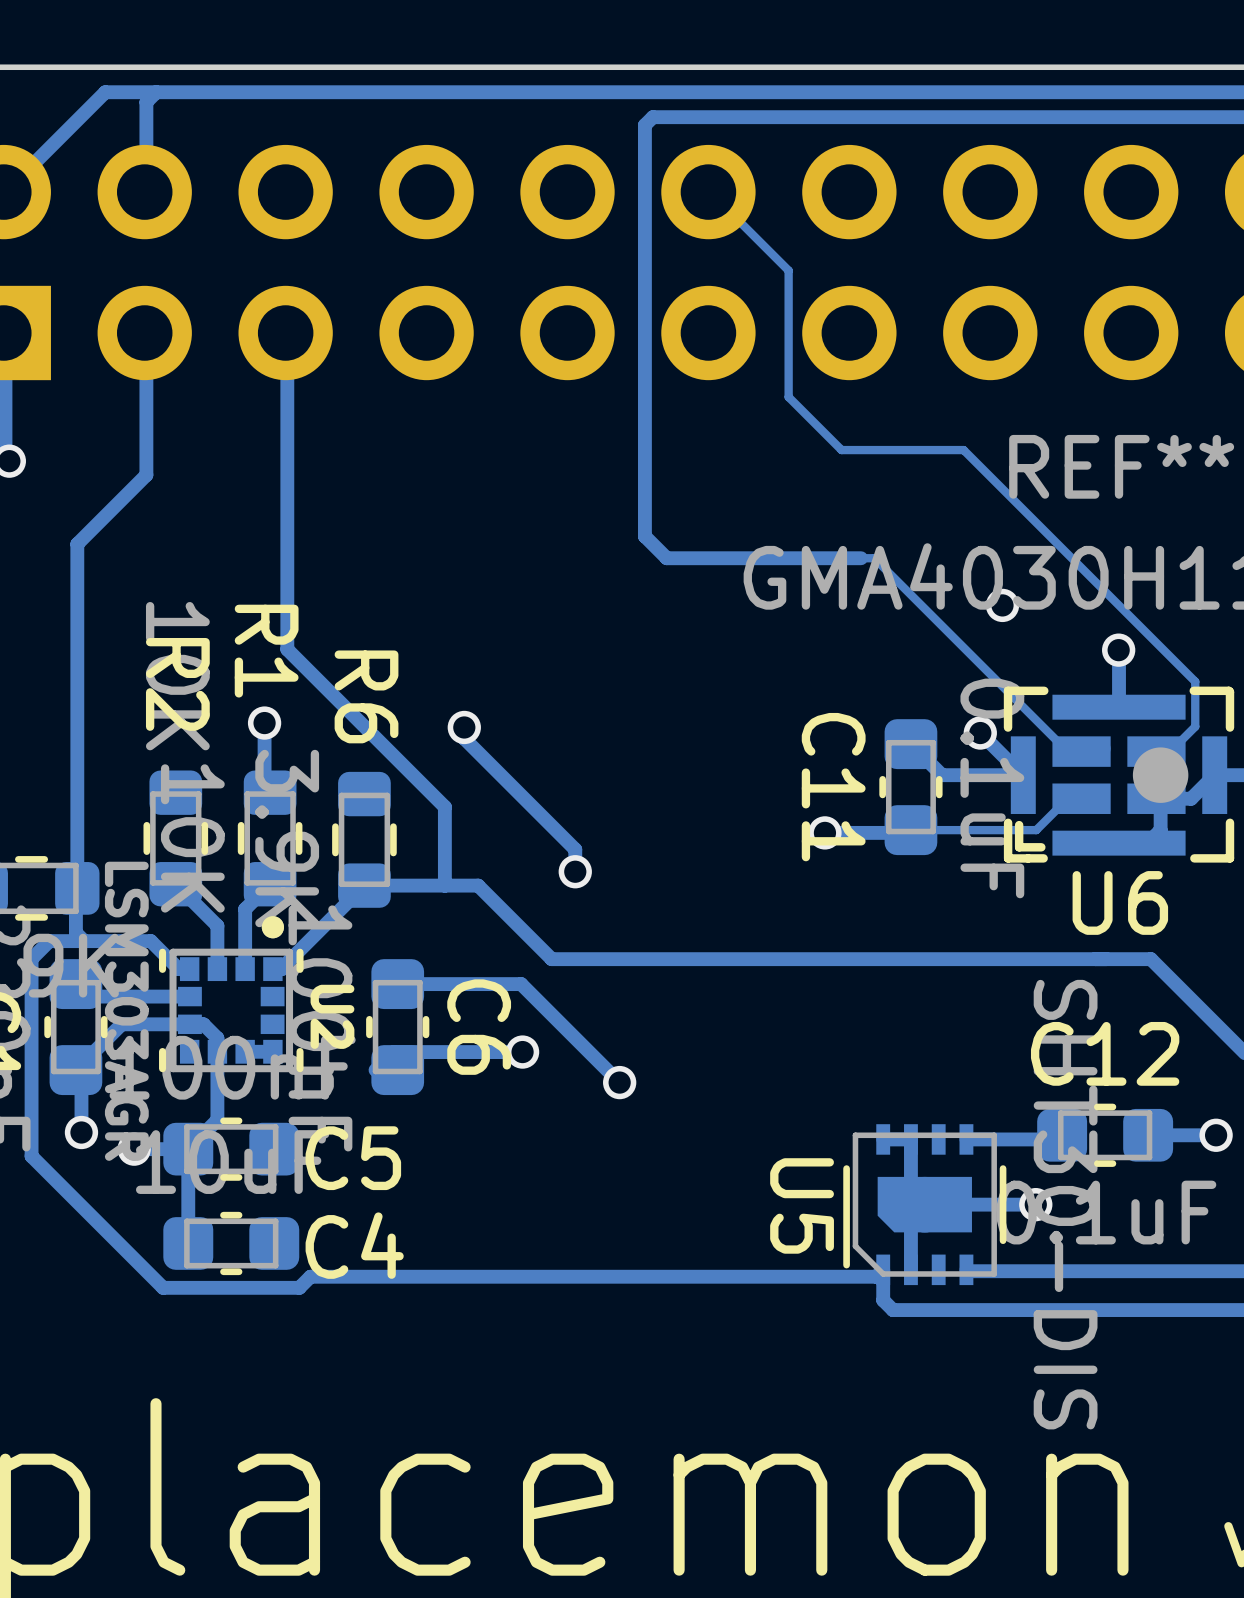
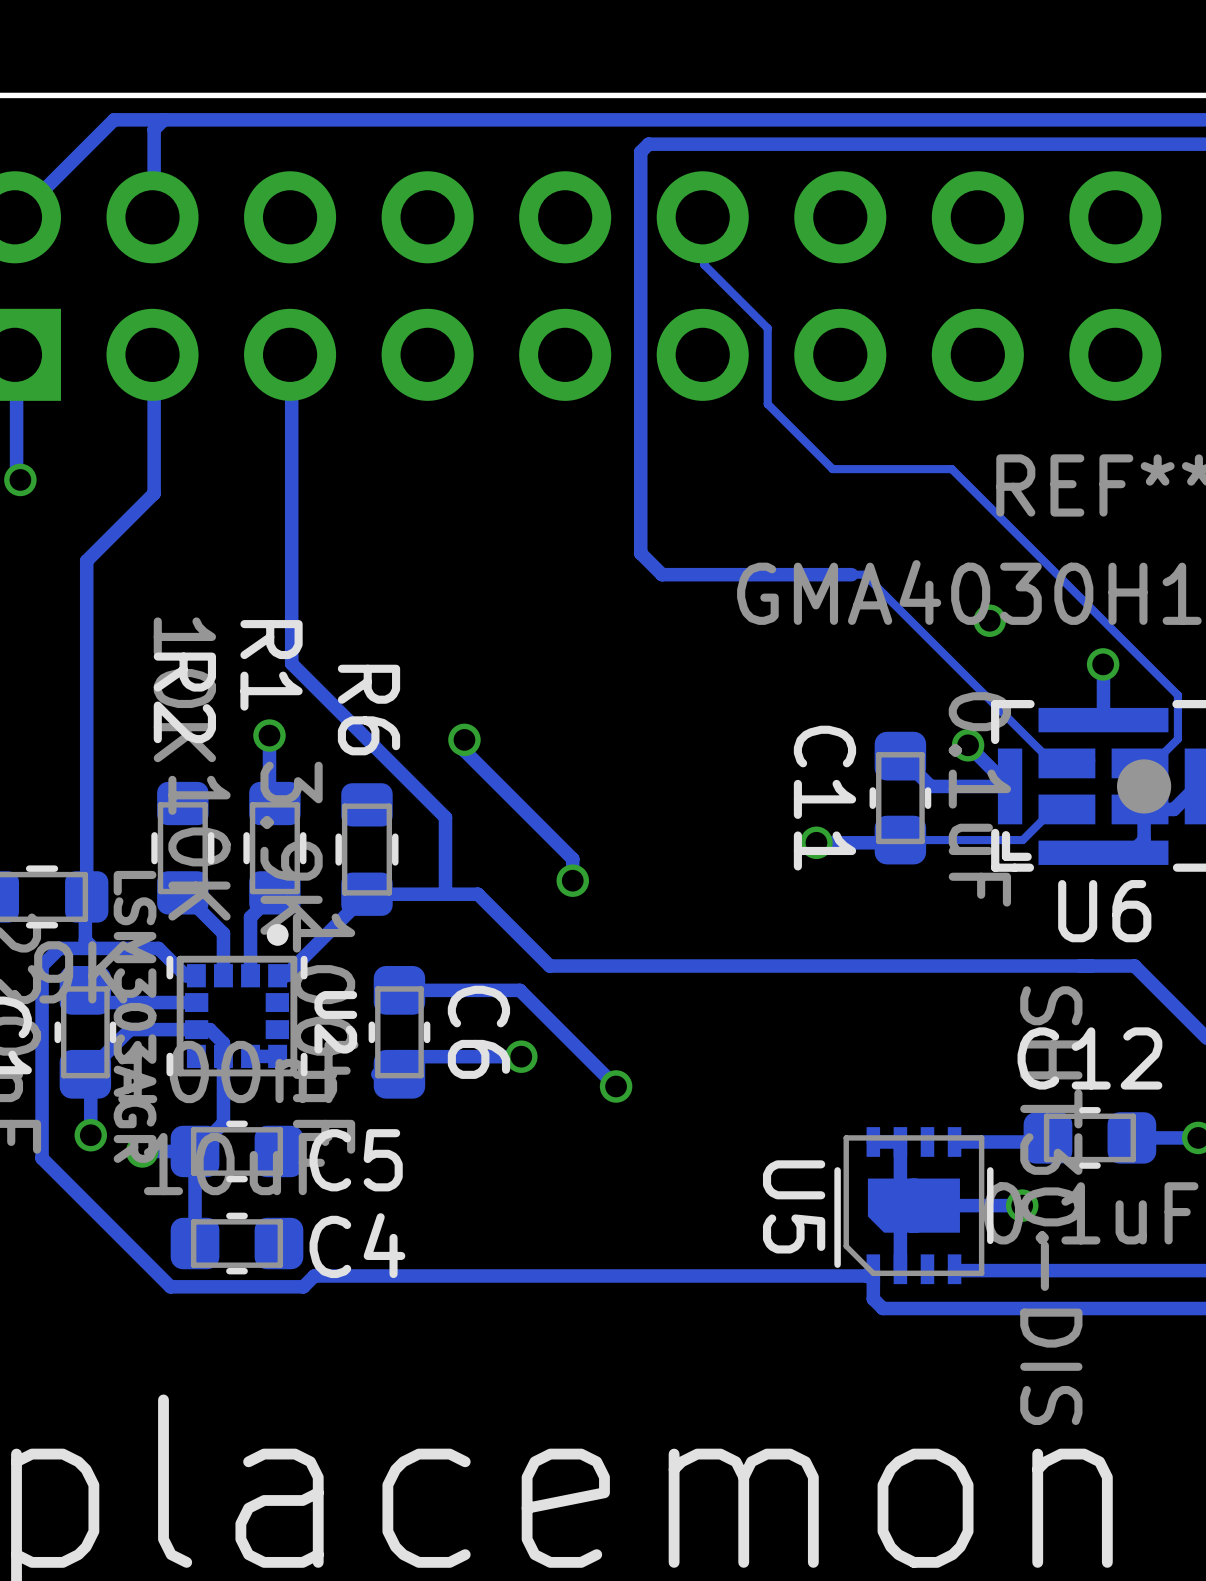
track: (710, 192) (788, 270) (788, 397) -> (704, 217) (704, 264) (767, 328) (767, 404) (781, 417)

